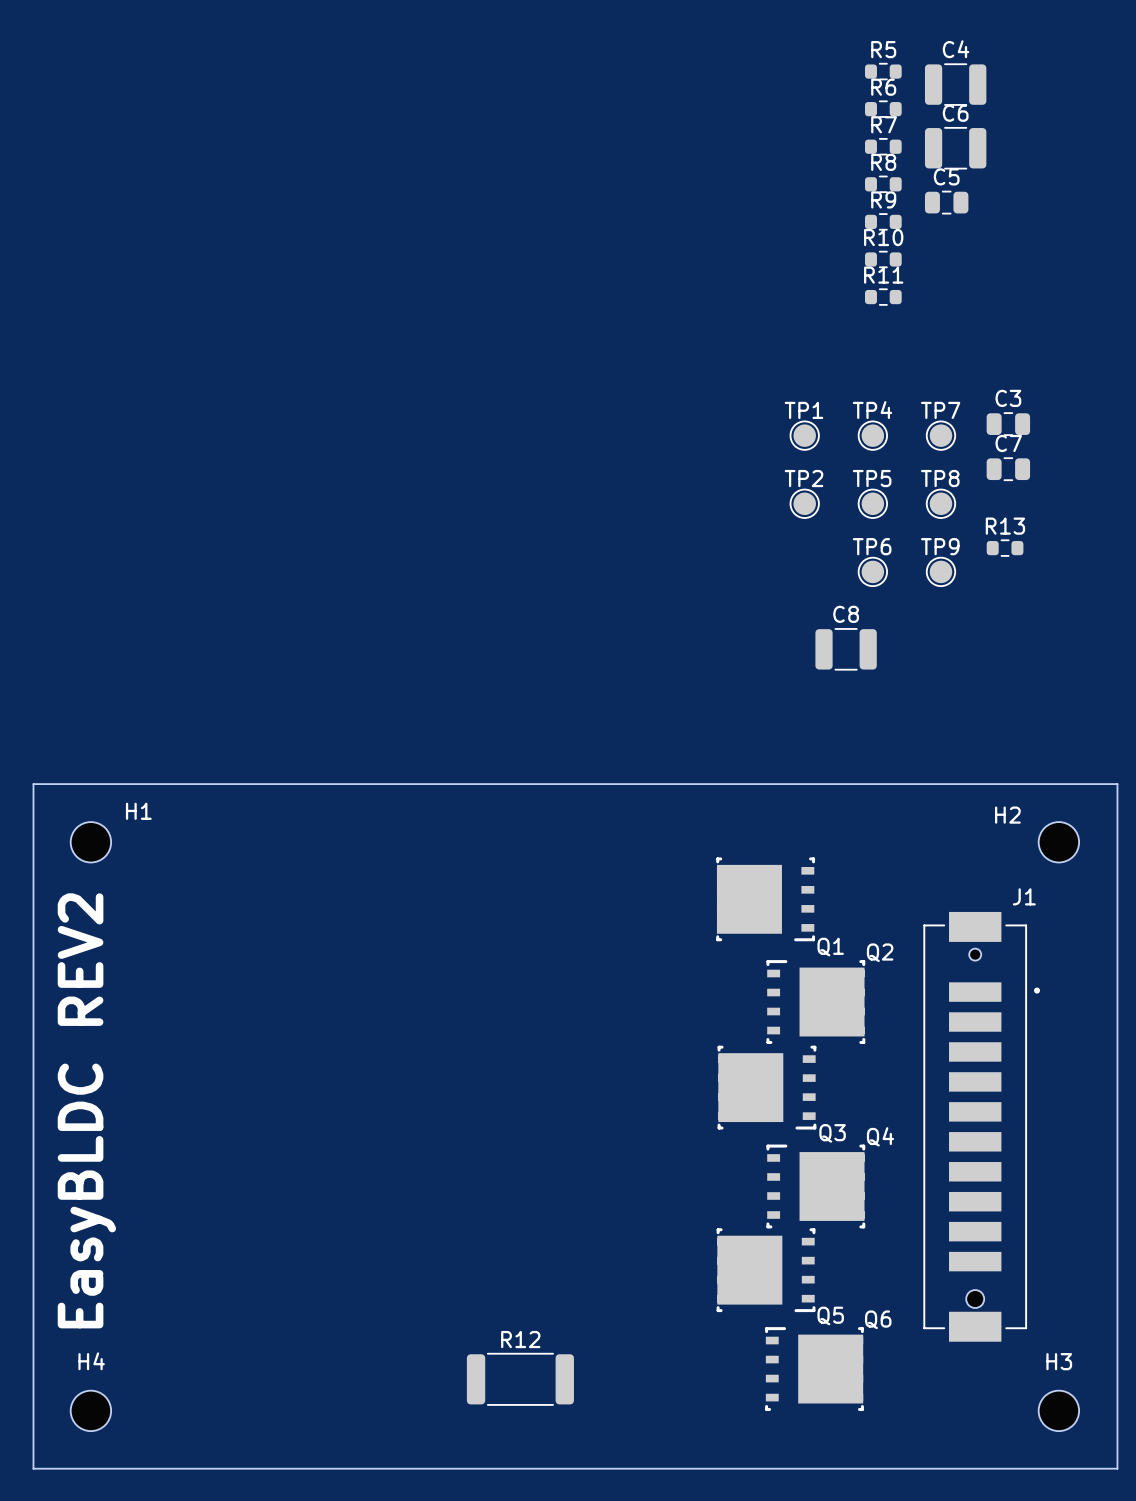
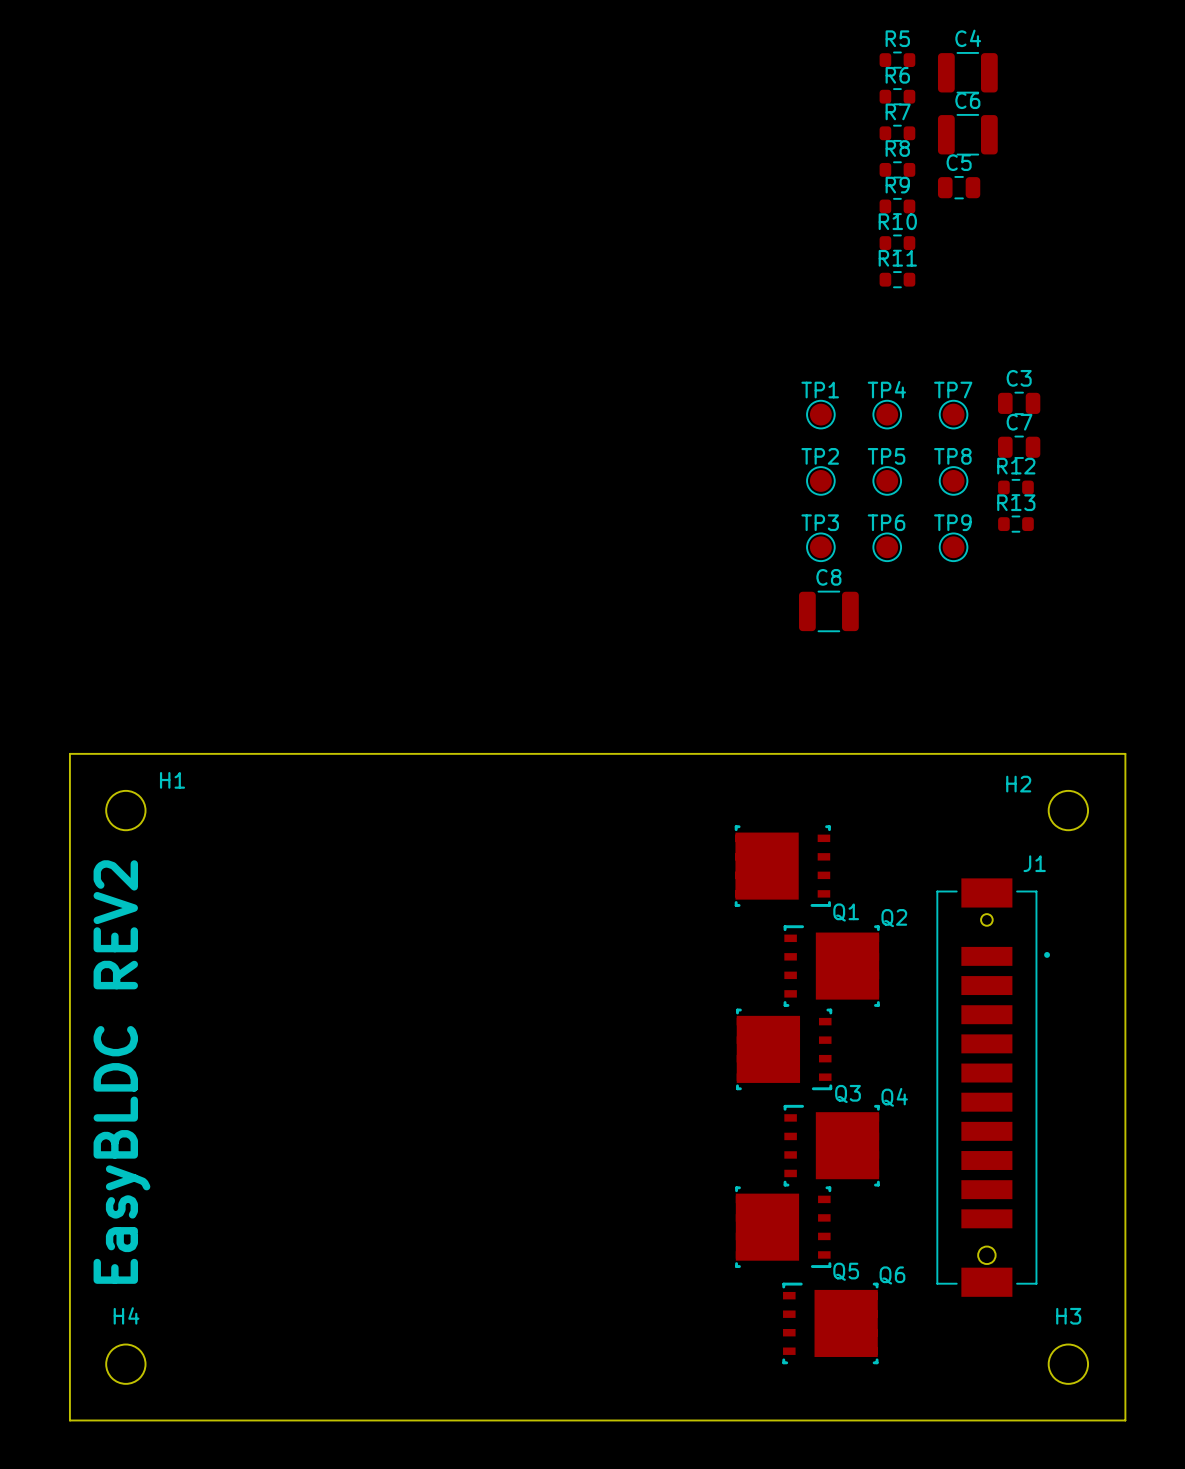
TP3: none -> (820, 547)
C8 position: (846, 649) -> (828, 611)
R12 footprint: [466, 1352, 574, 1406] -> [998, 479, 1034, 496]

